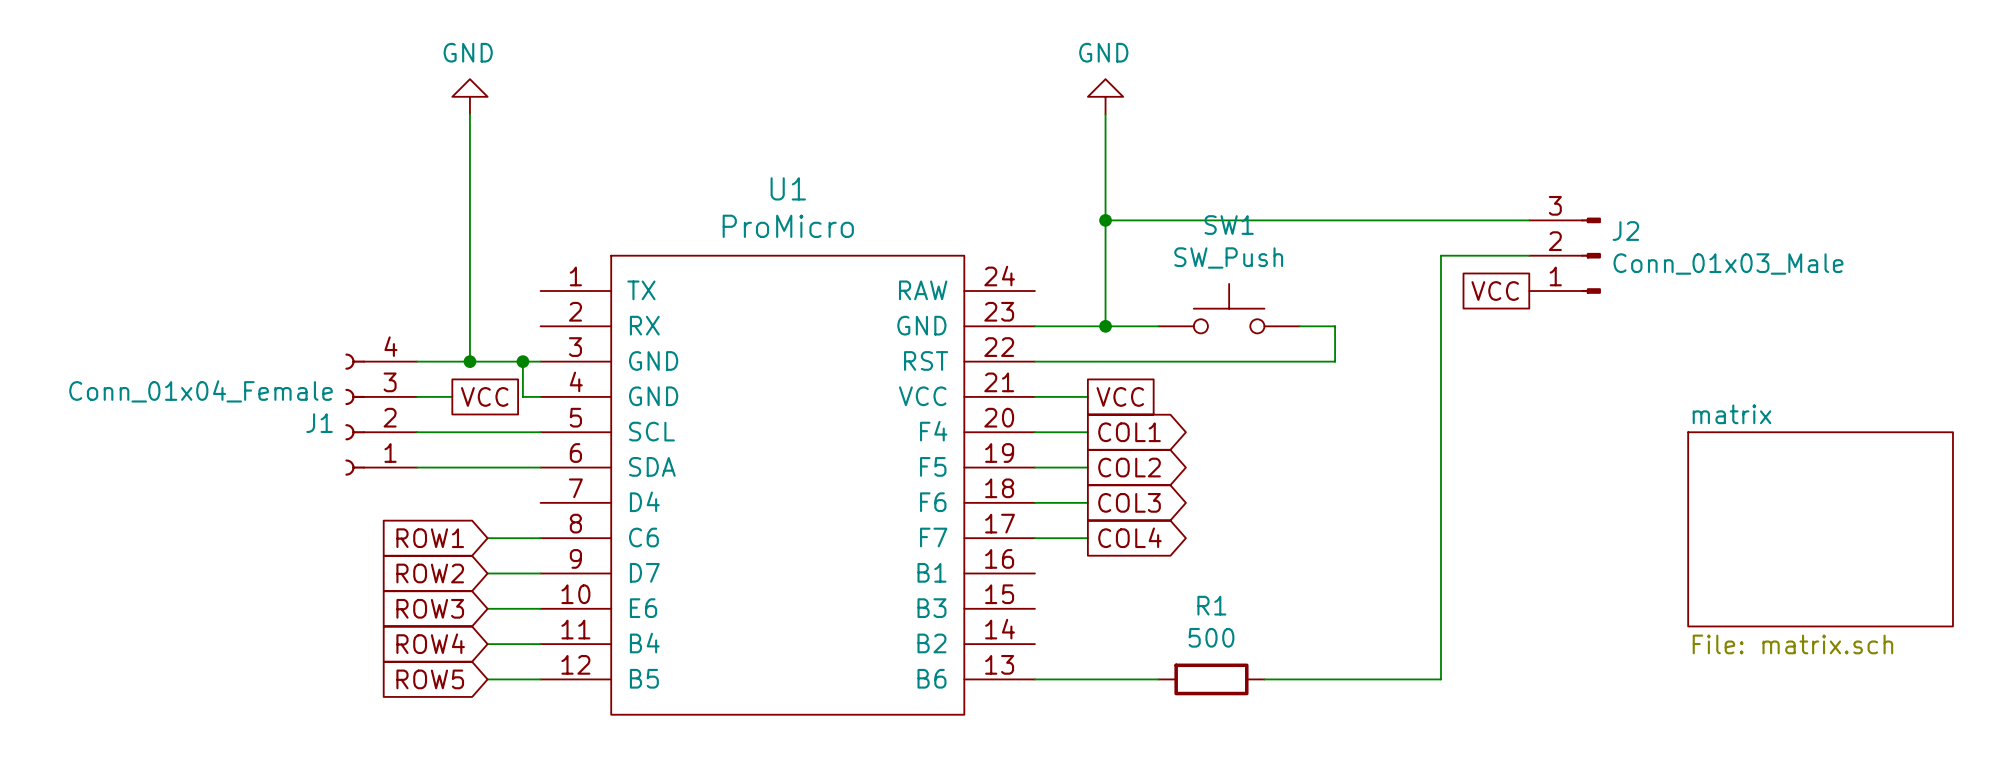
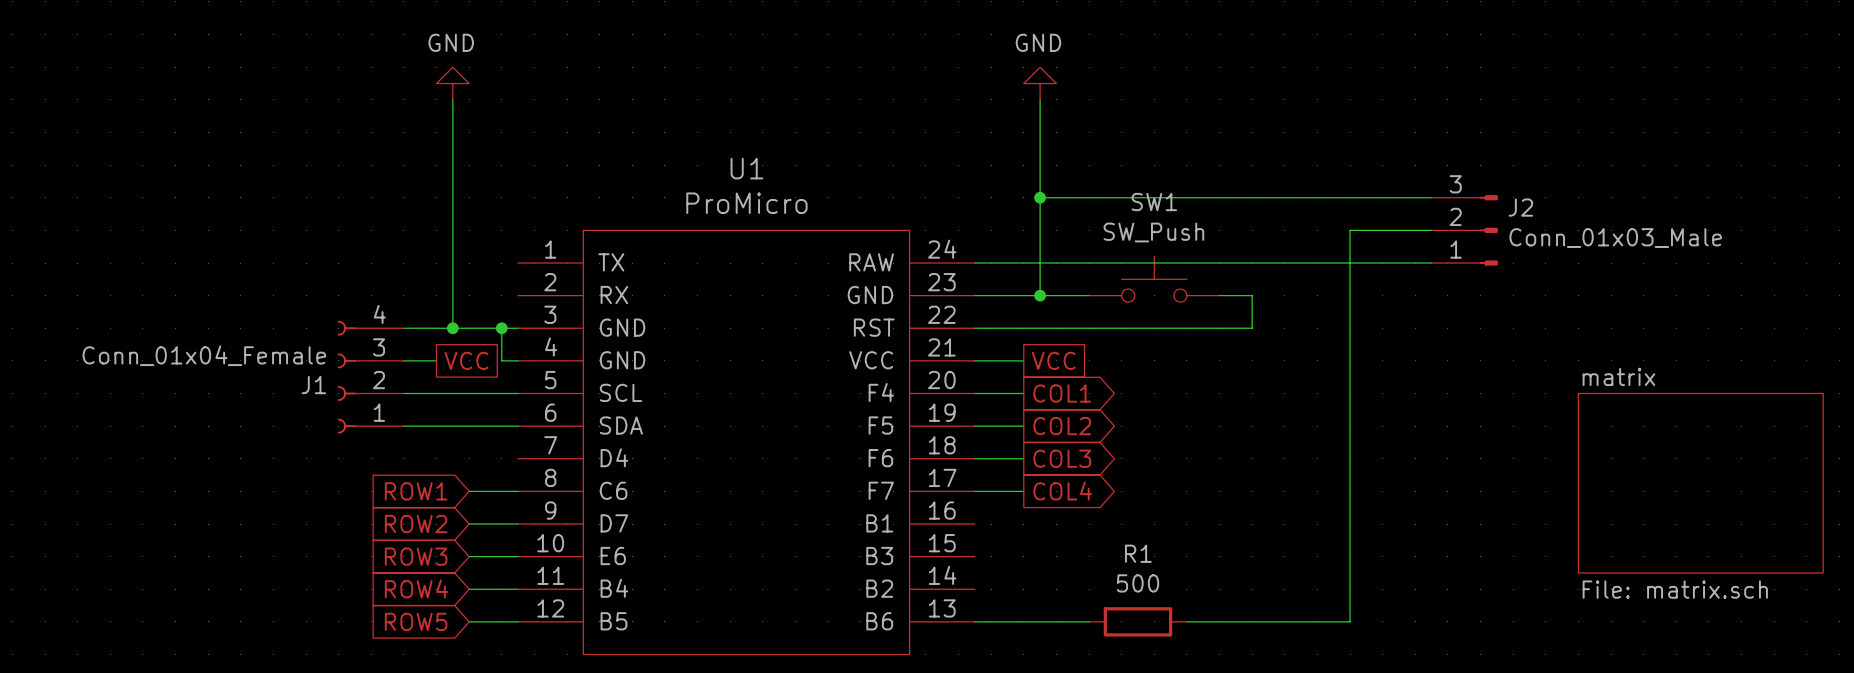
wire: none -> (974, 263) (1431, 263)
global label: VCC (1495, 291) -> none

